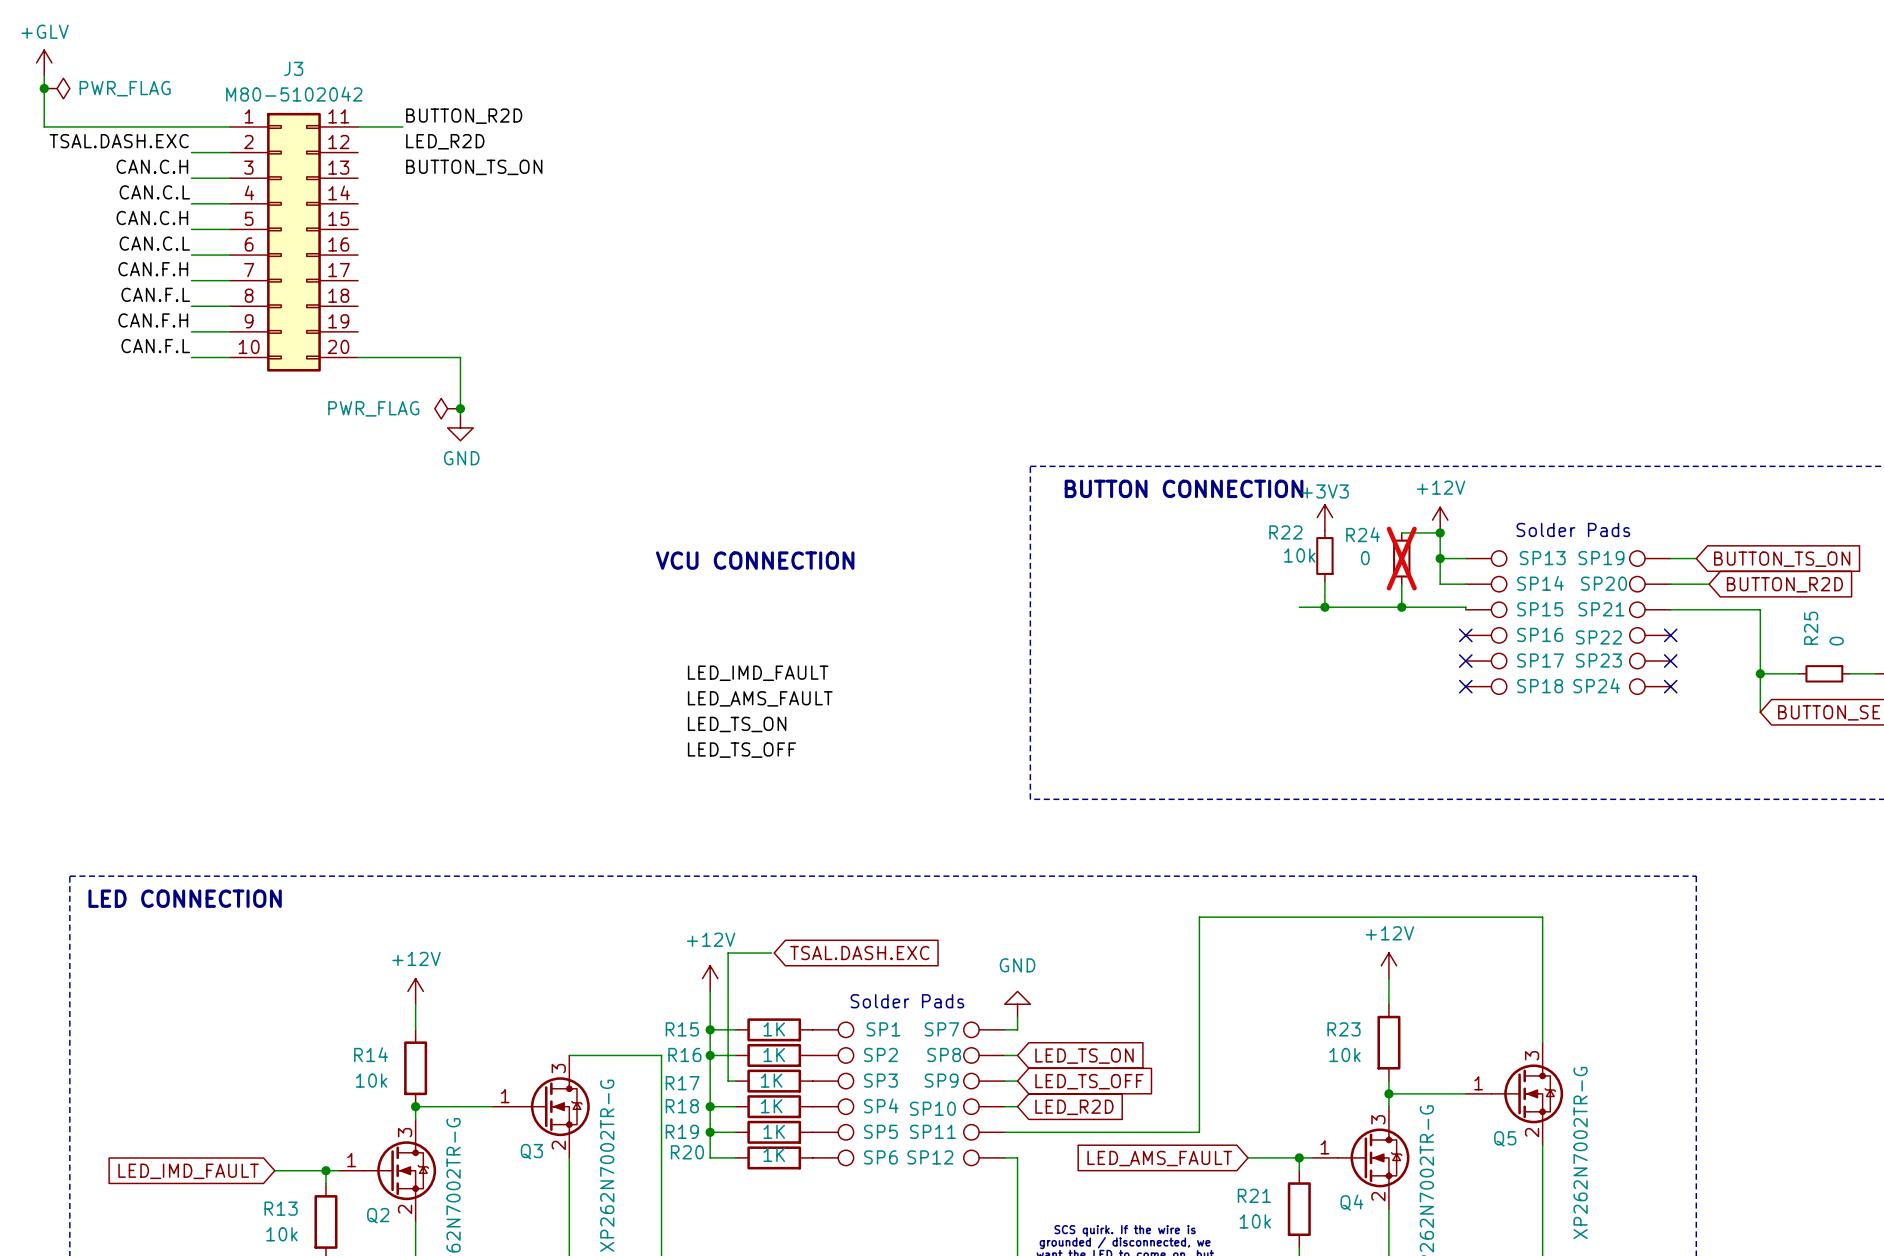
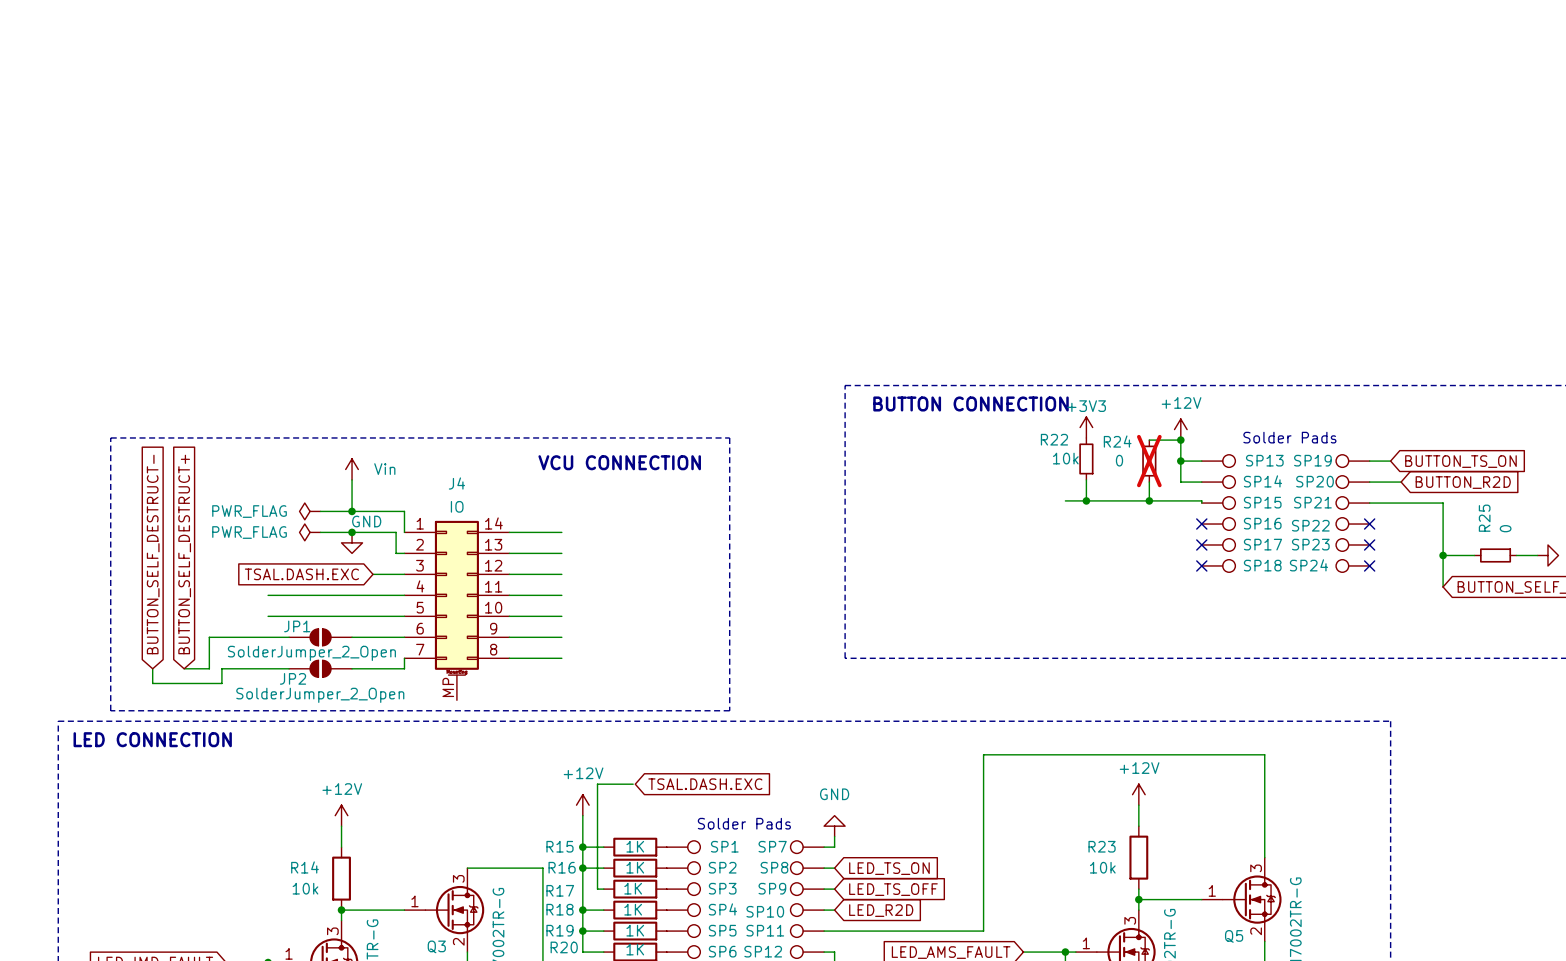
power symbol: +GLV (44, 62) -> none
wire: (44, 75) (44, 126) (229, 126) -> none
junction: (44, 88) -> none
power symbol: PWR_FLAG (57, 88) -> none
label: BUTTON_R2D (464, 116) -> none
wire: (358, 126) (402, 126) -> none
label: TSAL.DASH.EXC (119, 141) -> none
label: LED_R2D (445, 141) -> none
wire: (191, 152) (229, 152) -> none
label: CAN.C.H (152, 166) -> none
label: BUTTON_TS_ON (474, 167) -> none
wire: (191, 178) (229, 178) -> none
label: CAN.C.L (154, 192) -> none
wire: (191, 203) (229, 203) -> none
label: CAN.C.H (152, 218) -> none
wire: (191, 229) (229, 229) -> none
J3: M80-5102042 (293, 242) -> none
label: CAN.C.L (154, 243) -> none
wire: (191, 255) (229, 255) -> none
label: CAN.F.H (153, 269) -> none
wire: (191, 280) (229, 280) -> none
label: CAN.F.L (155, 294) -> none
wire: (191, 306) (229, 306) -> none
label: CAN.F.H (153, 320) -> none
wire: (191, 331) (229, 331) -> none
label: CAN.F.L (155, 346) -> none
wire: (191, 357) (229, 357) -> none
wire: (358, 357) (460, 357) (460, 415) -> none
power symbol: PWR_FLAG (447, 408) -> none
junction: (460, 408) -> none
power symbol position: GND (460, 427) -> GND (352, 542)
power symbol text position: GND (461, 458) -> GND (366, 521)
line: none -> (110, 437) (729, 437) (729, 710) (110, 710) (110, 437)
power symbol: none -> Vin (352, 469)
wire: none -> (352, 479) (352, 511)
power symbol: none -> PWR_FLAG (310, 511)
wire: none -> (320, 511) (404, 511) (404, 532)
junction: none -> (352, 511)
power symbol: none -> PWR_FLAG (310, 532)
wire: none -> (320, 532) (396, 532) (396, 553) (404, 553)
junction: none -> (352, 532)
wire: none -> (509, 532) (561, 532)
wire: none -> (509, 553) (561, 553)
global label: none -> BUTTON_SELF_DESTRUCT- (153, 554)
global label: none -> BUTTON_SELF_DESTRUCT+ (184, 554)
label: LED_IMD_FAULT (758, 673) -> none
global label: none -> TSAL.DASH.EXC (301, 574)
wire: none -> (373, 574) (404, 574)
wire: none -> (509, 574) (561, 574)
label: LED_AMS_FAULT (760, 698) -> none
wire: none -> (268, 595) (404, 595)
wire: none -> (509, 595) (561, 595)
label: LED_TS_ON (737, 724) -> none
J4: none -> IO (456, 610)
wire: none -> (268, 616) (404, 616)
wire: none -> (509, 616) (561, 616)
label: LED_TS_OFF (741, 750) -> none
wire: none -> (289, 637) (209, 637) (209, 668) (184, 668)
JP1: none -> SolderJumper_2_Open (320, 637)
wire: none -> (352, 637) (404, 637)
wire: none -> (509, 637) (561, 637)
wire: none -> (404, 658) (404, 668) (352, 668)
wire: none -> (509, 658) (561, 658)
wire: none -> (152, 668) (152, 683) (221, 683) (221, 668) (289, 668)
JP2: none -> SolderJumper_2_Open (320, 668)

